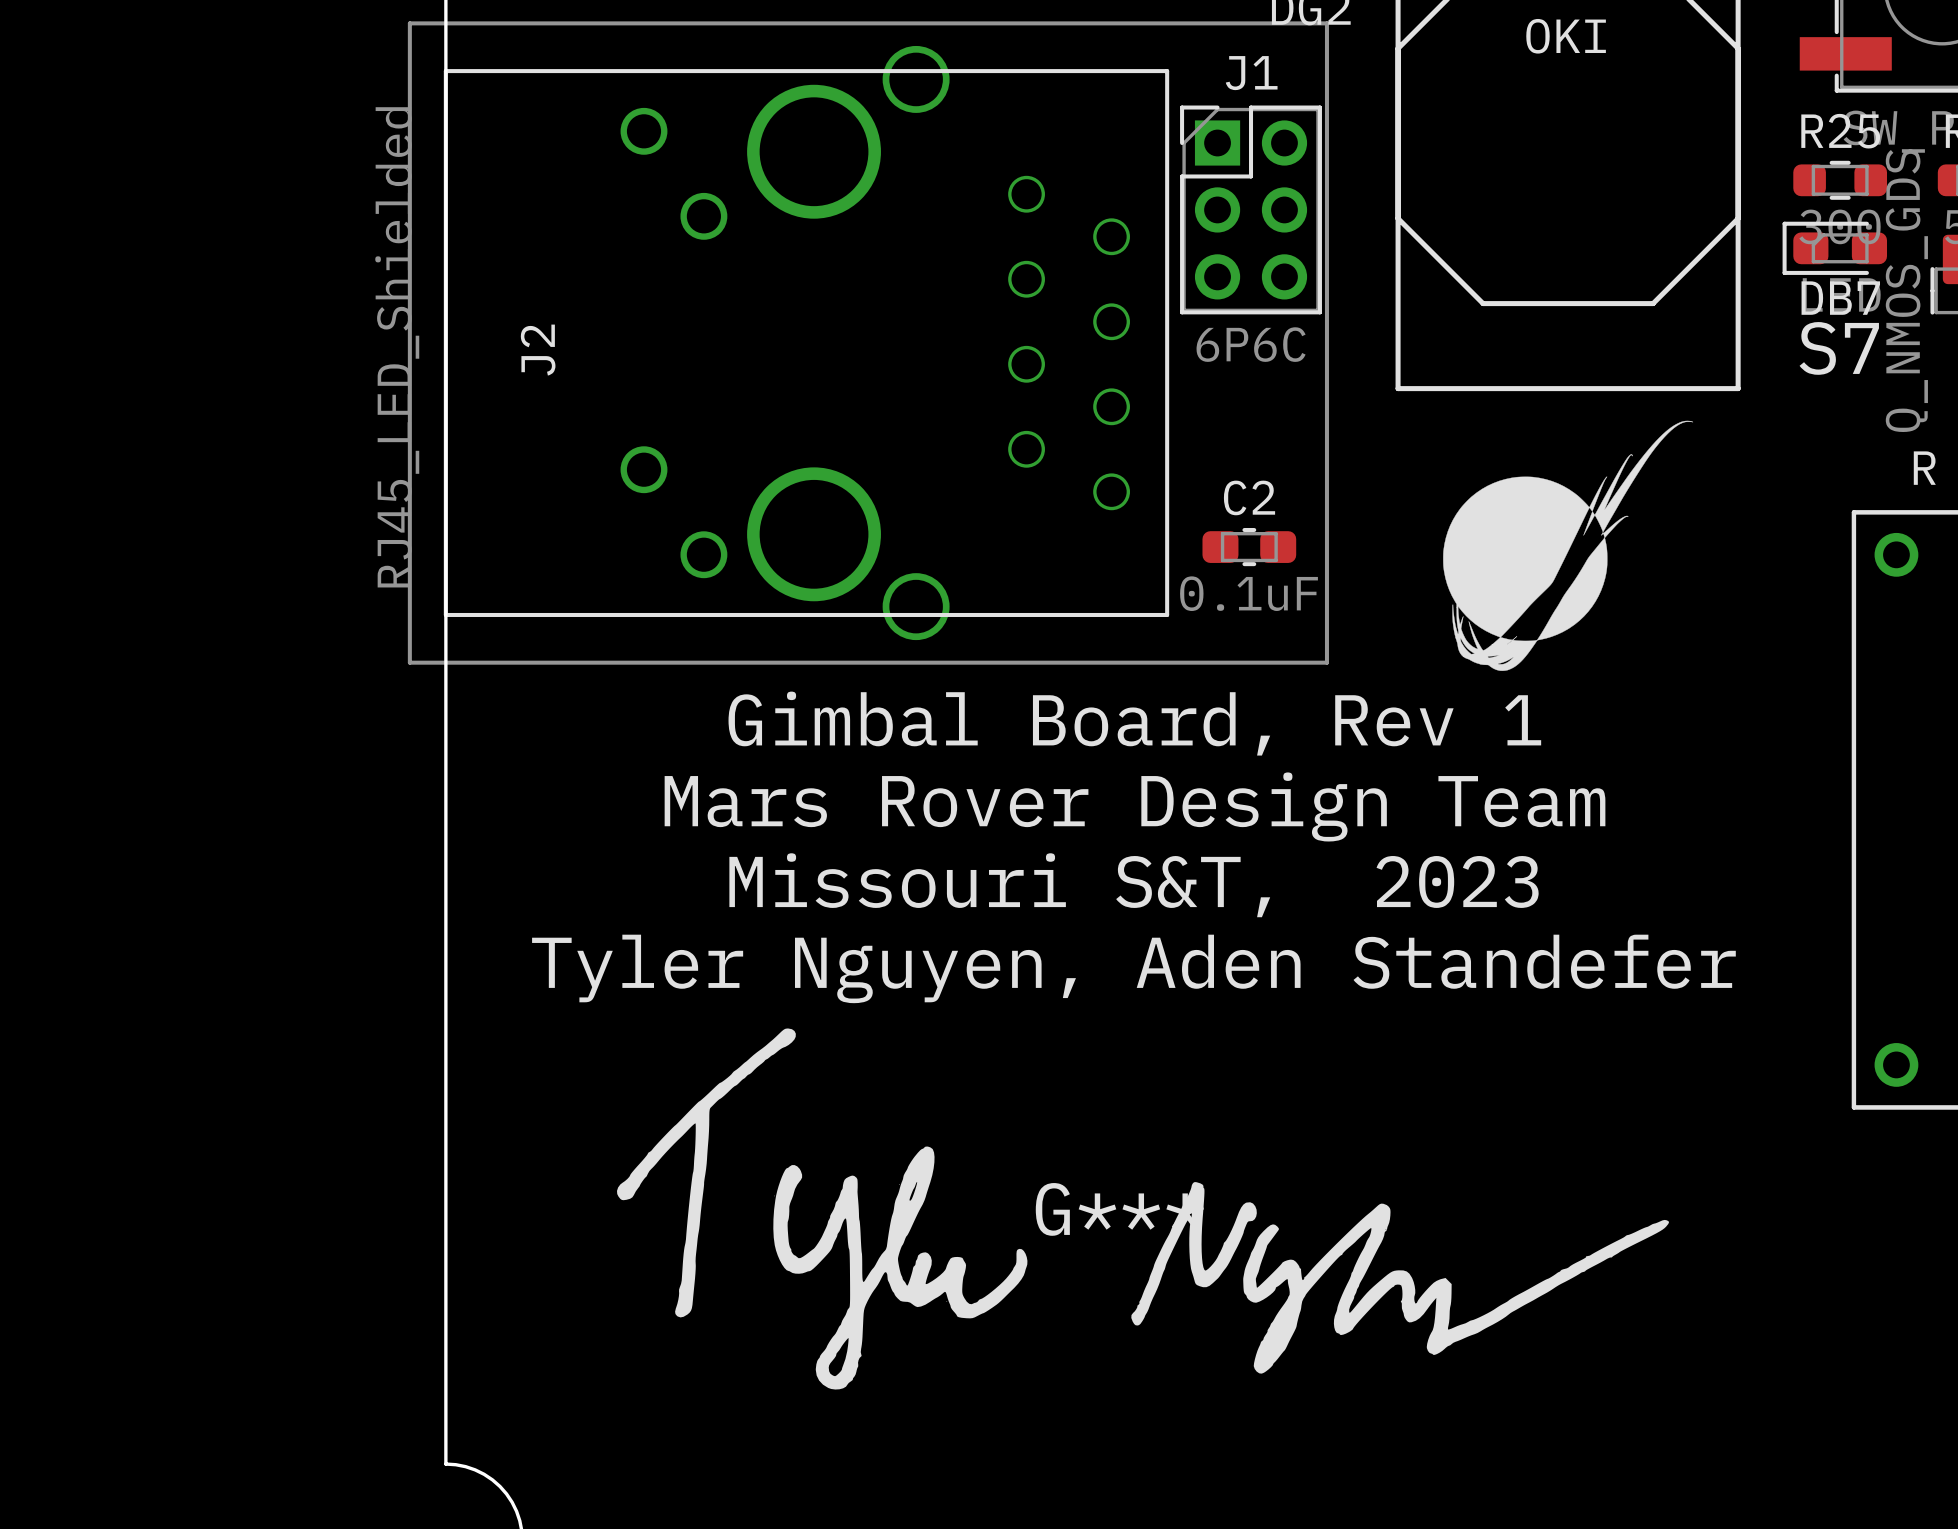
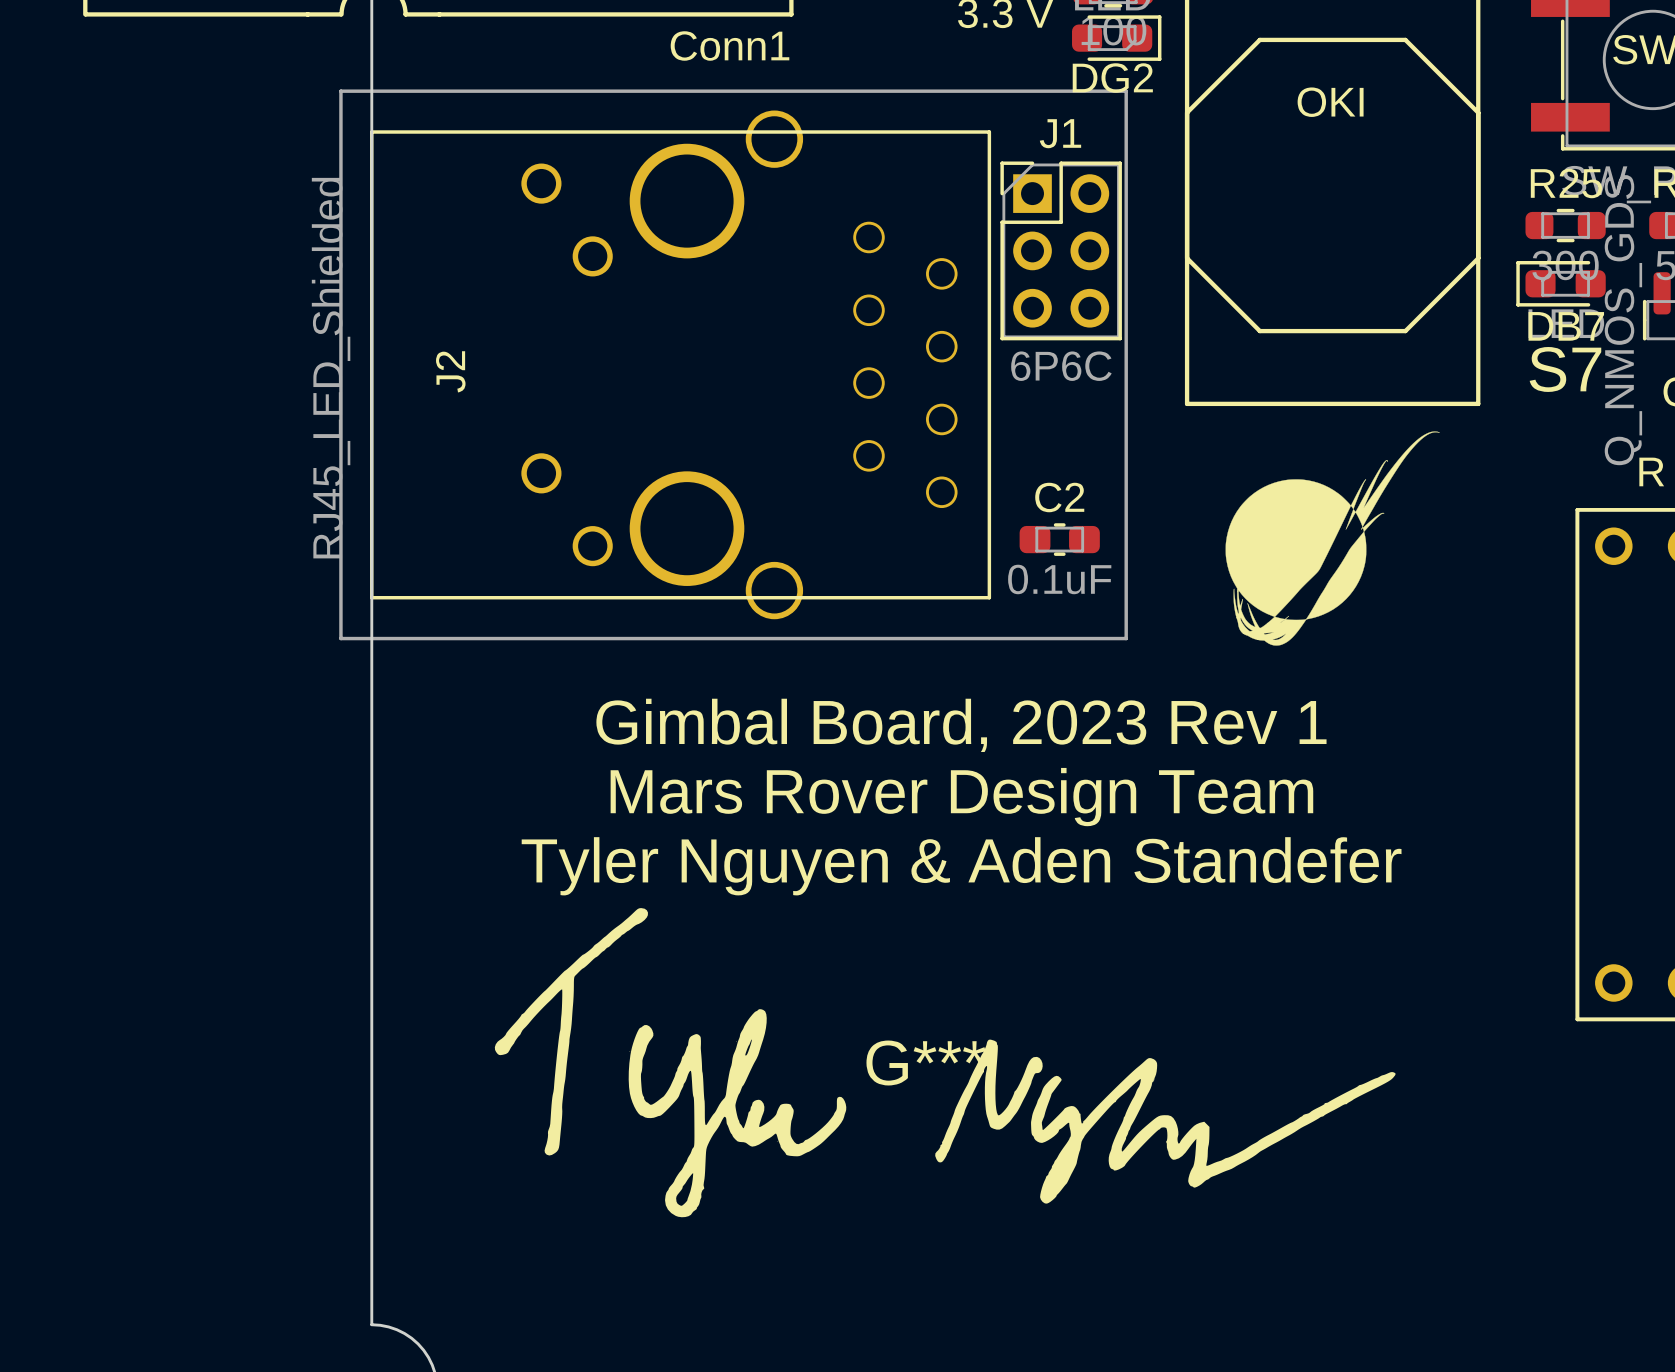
text: Gimbal Board, Rev 1 (1134, 723) -> Gimbal Board, 2023 Rev 1 (961, 725)
text position: Mars Rover Design Team (1135, 806) -> Mars Rover Design Team (961, 797)
text: Missouri S&T, 2023 (1134, 885) -> none
text: Tyler Nguyen, Aden Standefer (1133, 968) -> Tyler Nguyen & Aden Standefer (961, 866)
G*** position: (1143, 1209) -> (945, 1062)

